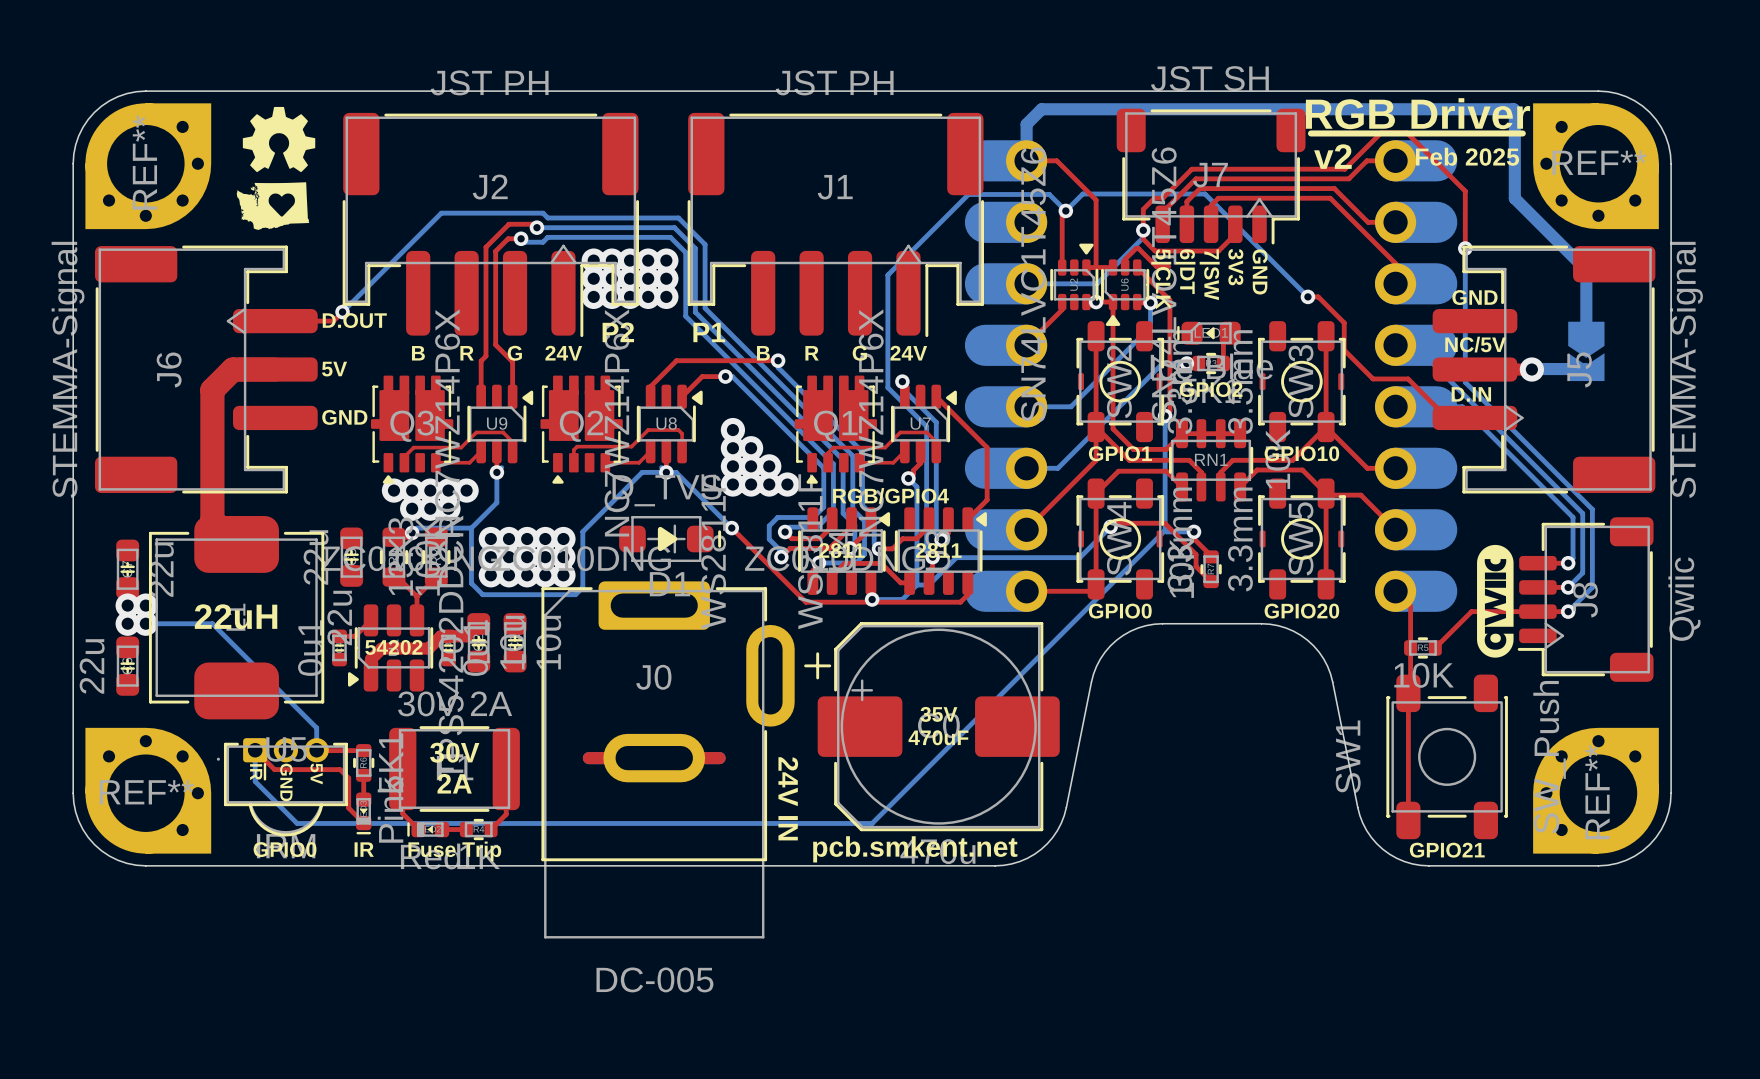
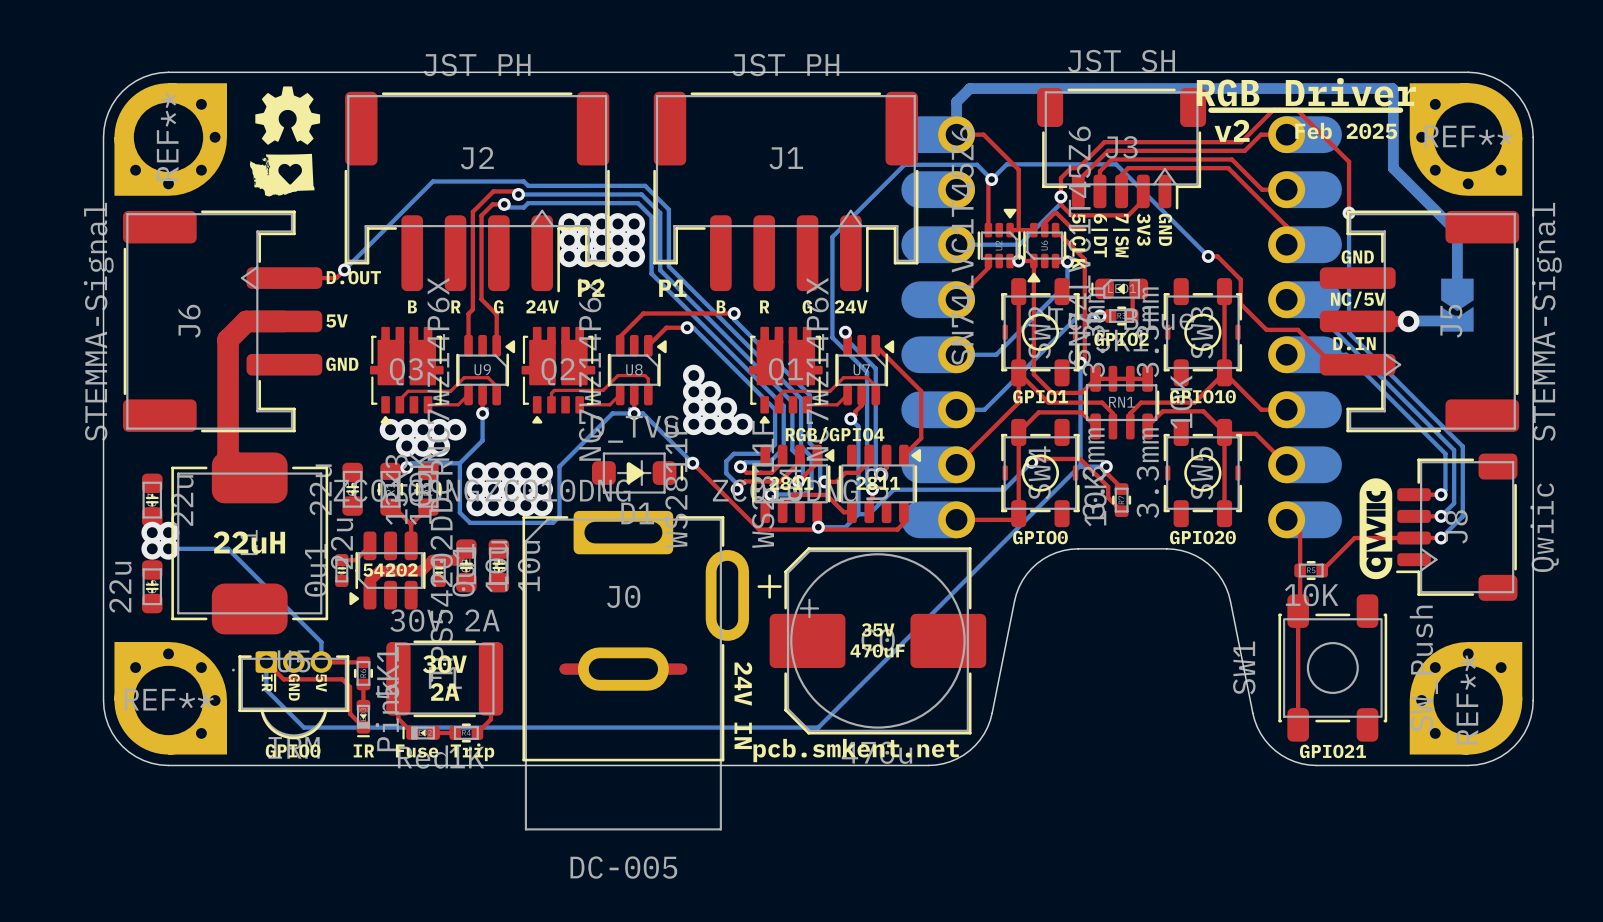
J7 name: J7 (1210, 175) -> J3 (1121, 147)

